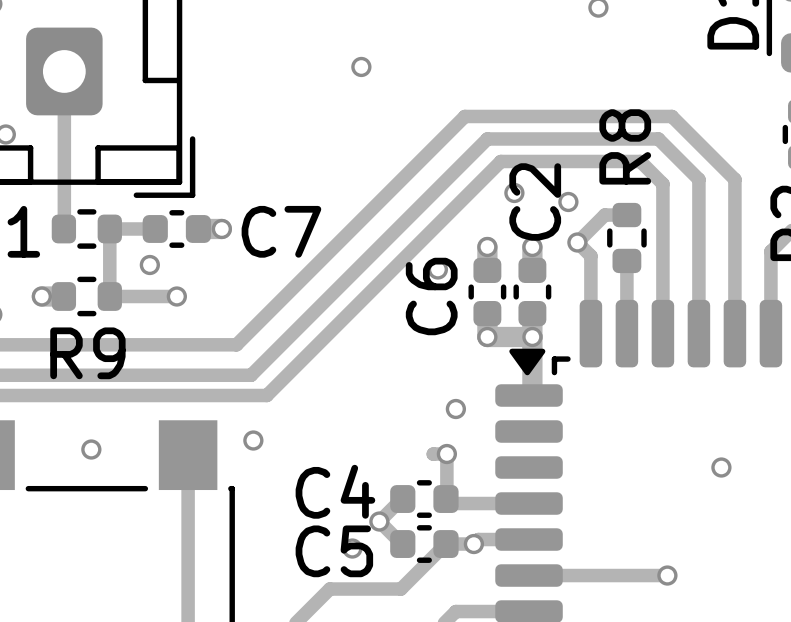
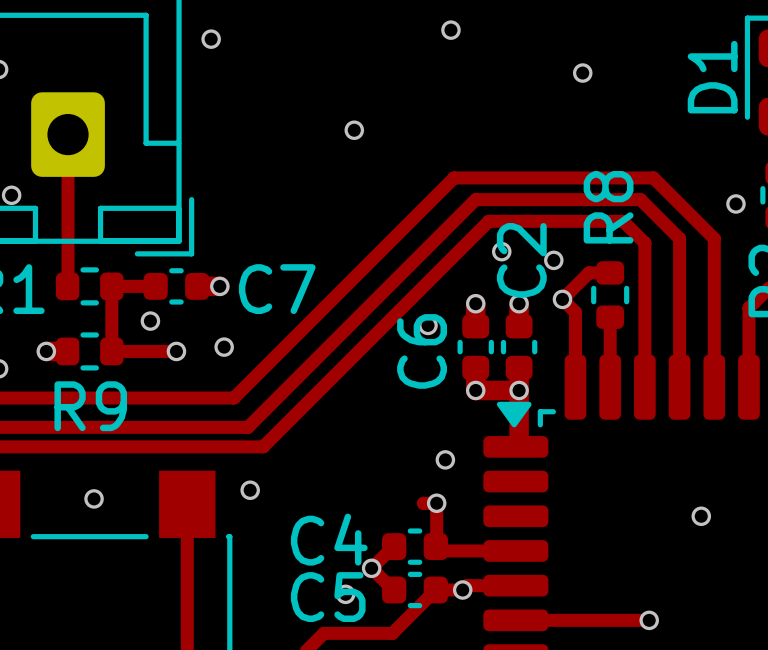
via: none -> (735, 203)
via: none -> (224, 347)

